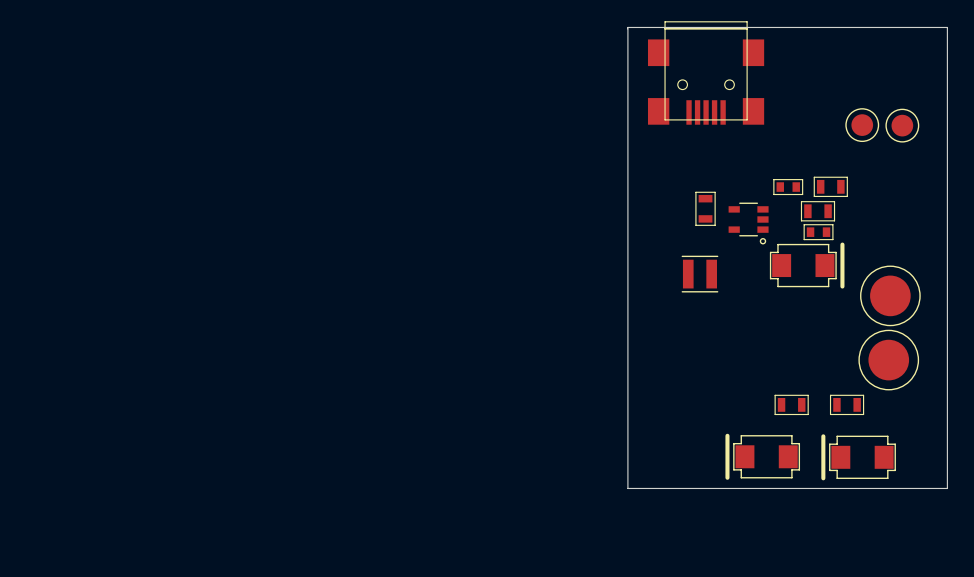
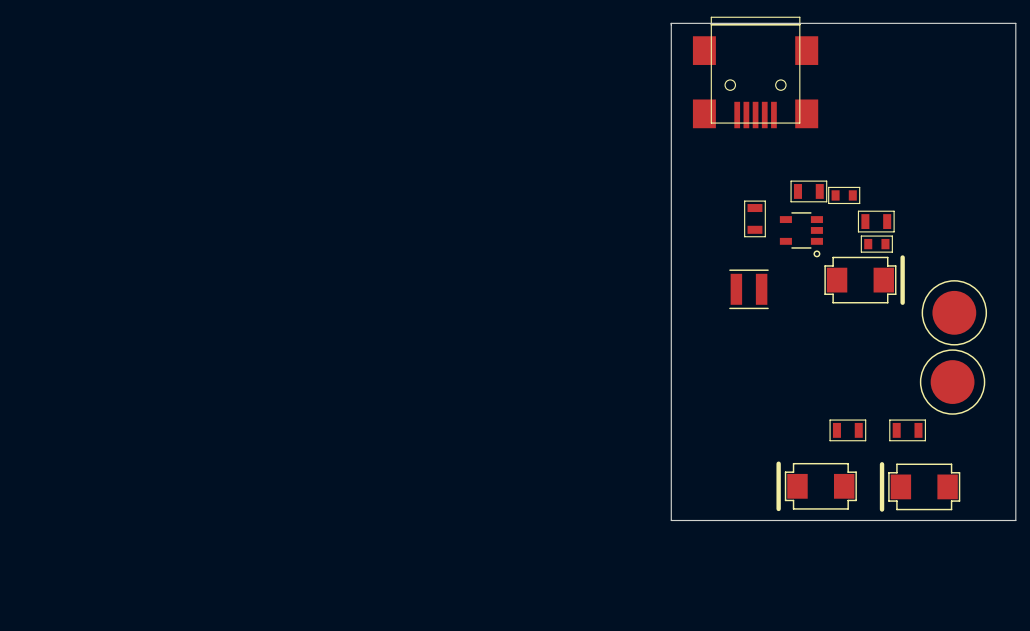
part: (862, 125) -> none
part: (902, 125) -> none
part position: (830, 186) -> (808, 191)

